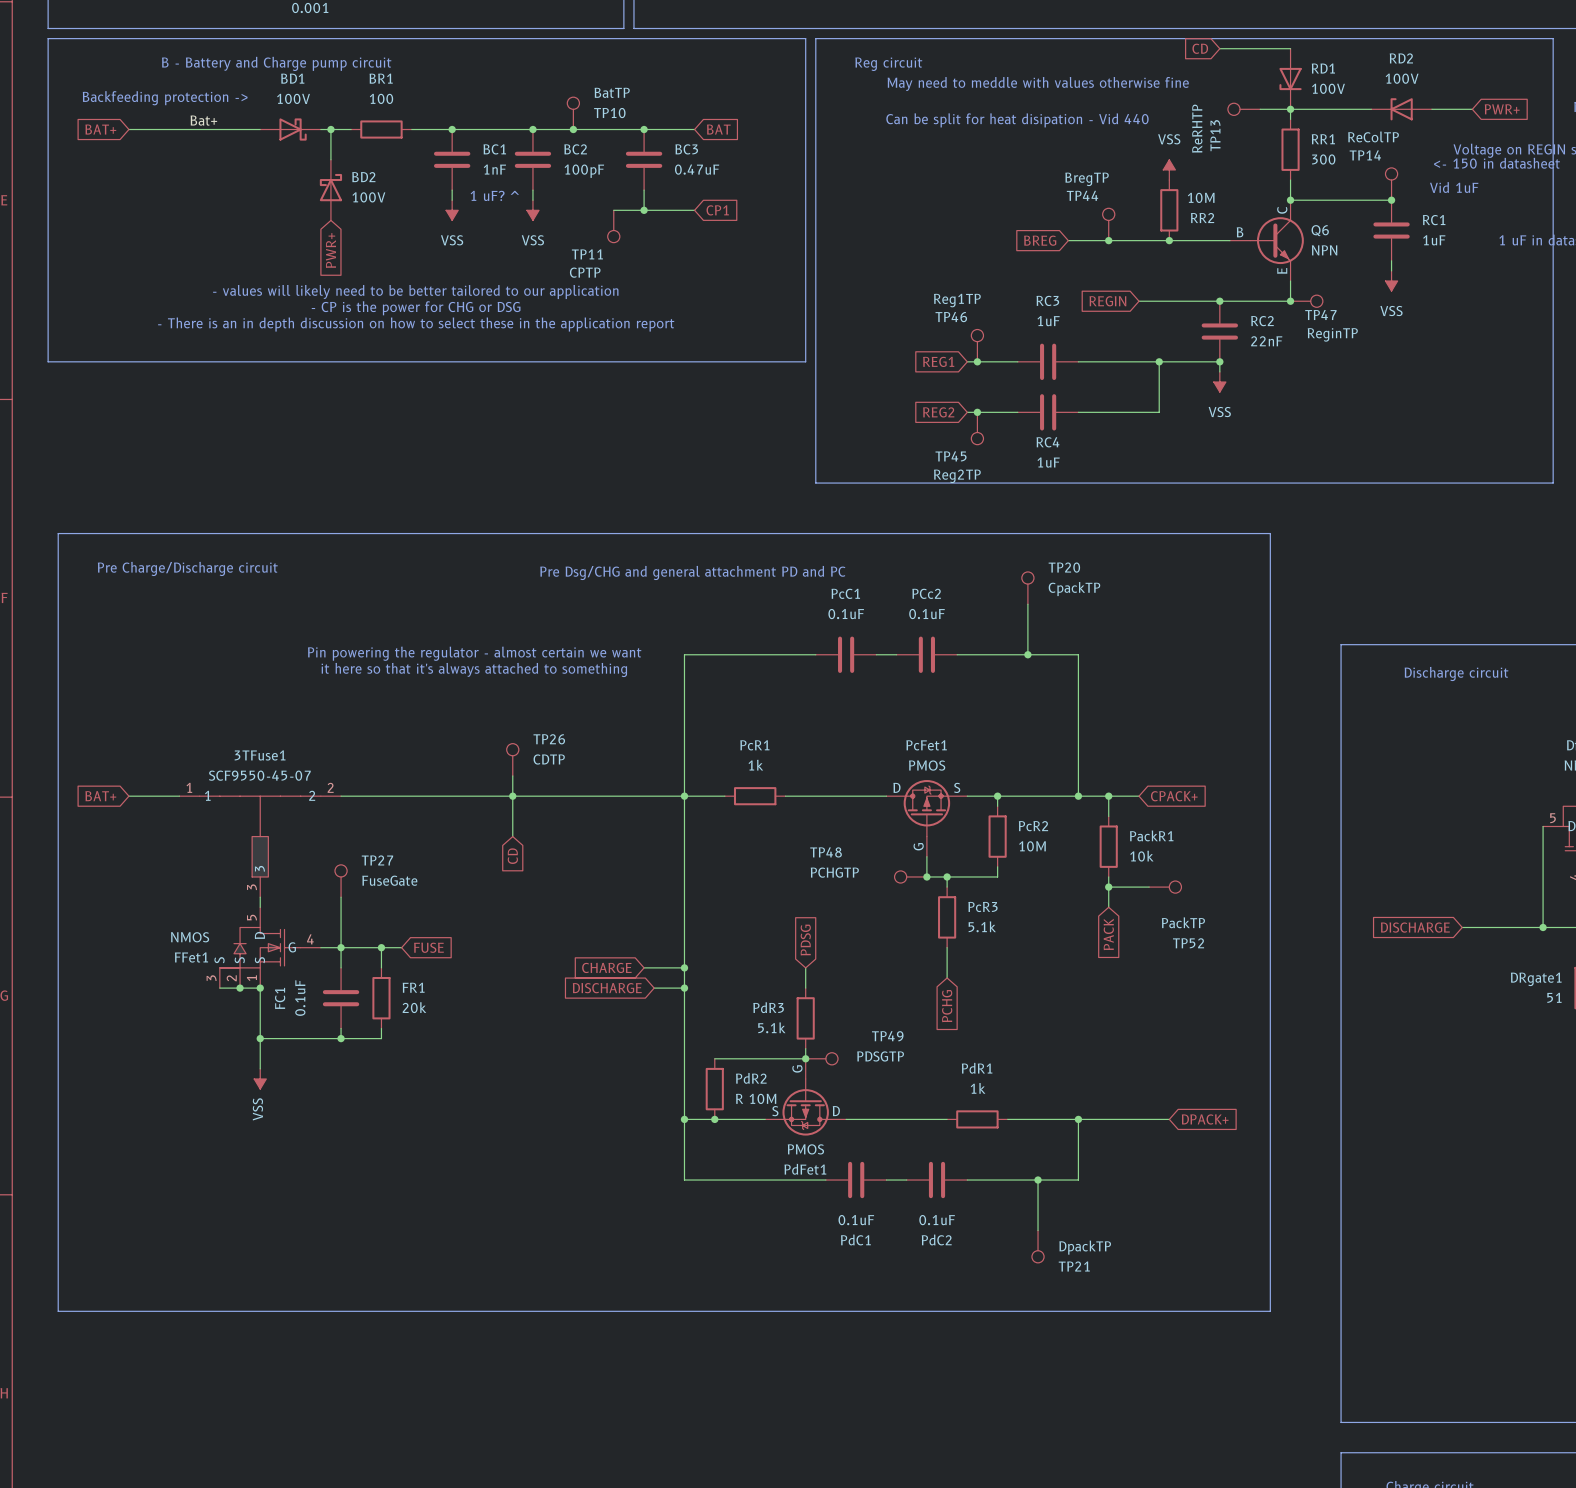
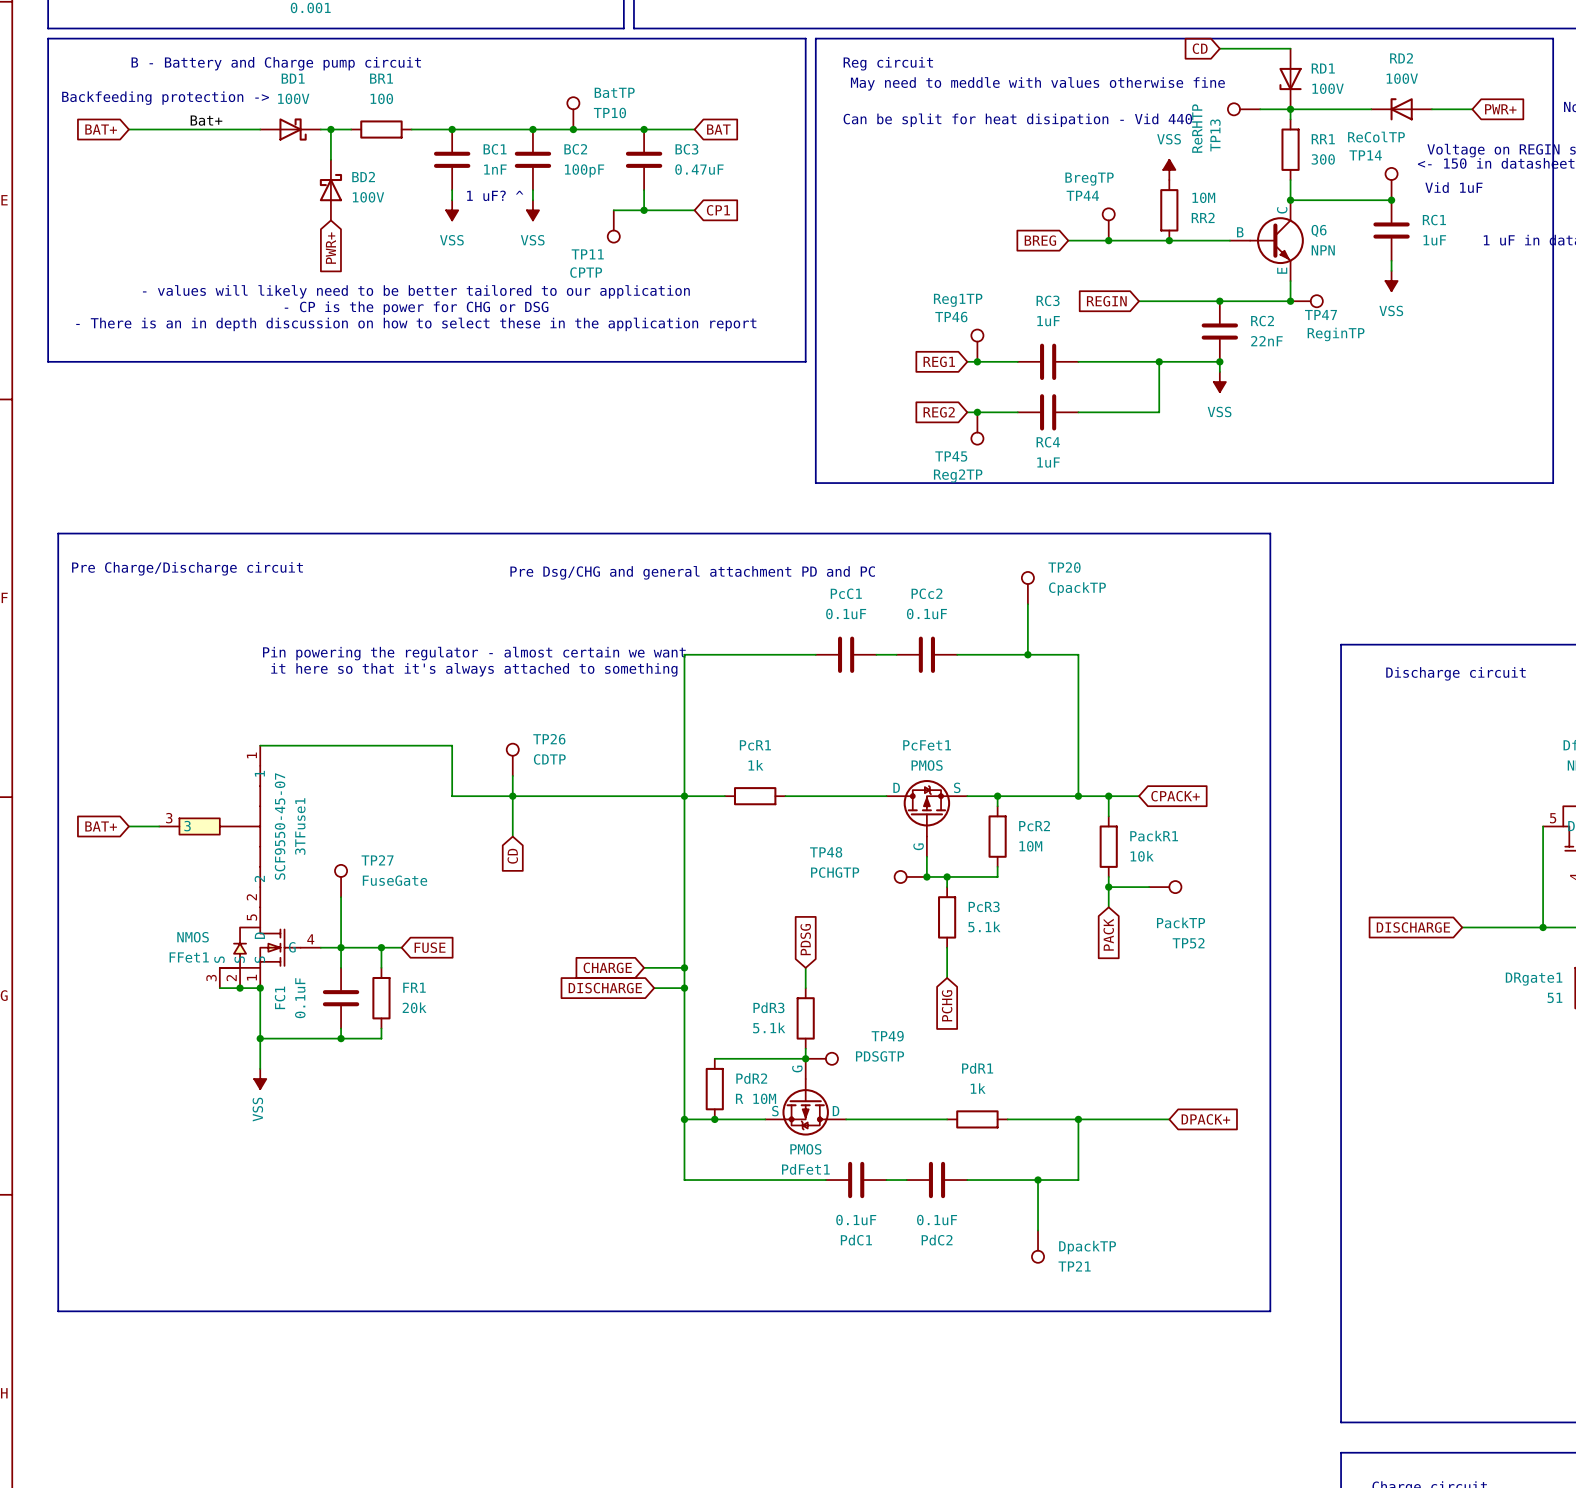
global label position: BAT+ (100, 796) -> BAT+ (101, 826)
wire: (128, 796) (179, 796) -> none
wire: (341, 796) (452, 796) -> (260, 745) (452, 745) (452, 796)
wire: none -> (128, 826) (159, 826)
3TFuse1 rotation: 0° (260, 836) -> 90° clockwise (219, 826)

